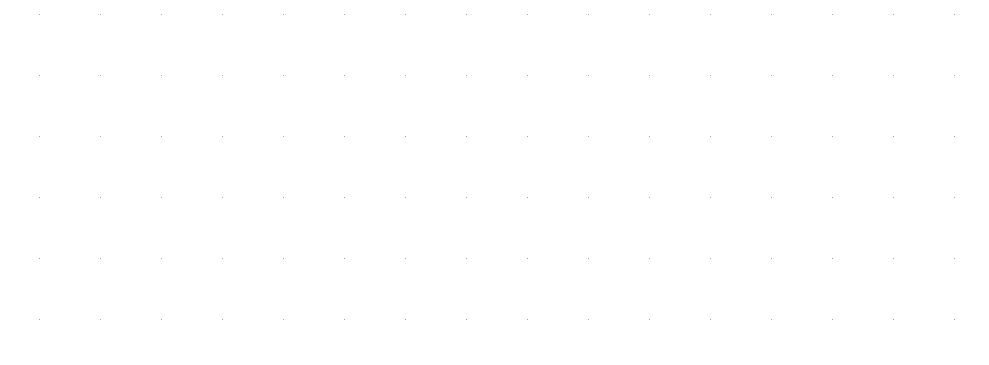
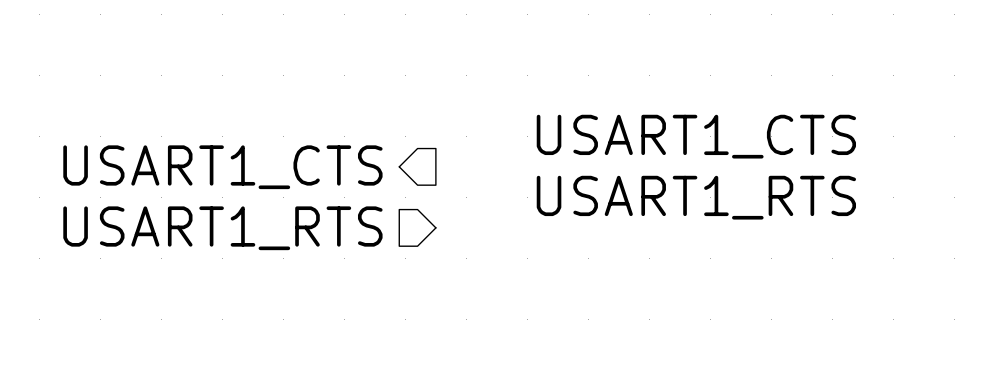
label: none -> USART1_CTS (696, 136)
hierarchical label: none -> USART1_CTS (222, 167)
label: none -> USART1_RTS (696, 197)
hierarchical label: none -> USART1_RTS (222, 228)

